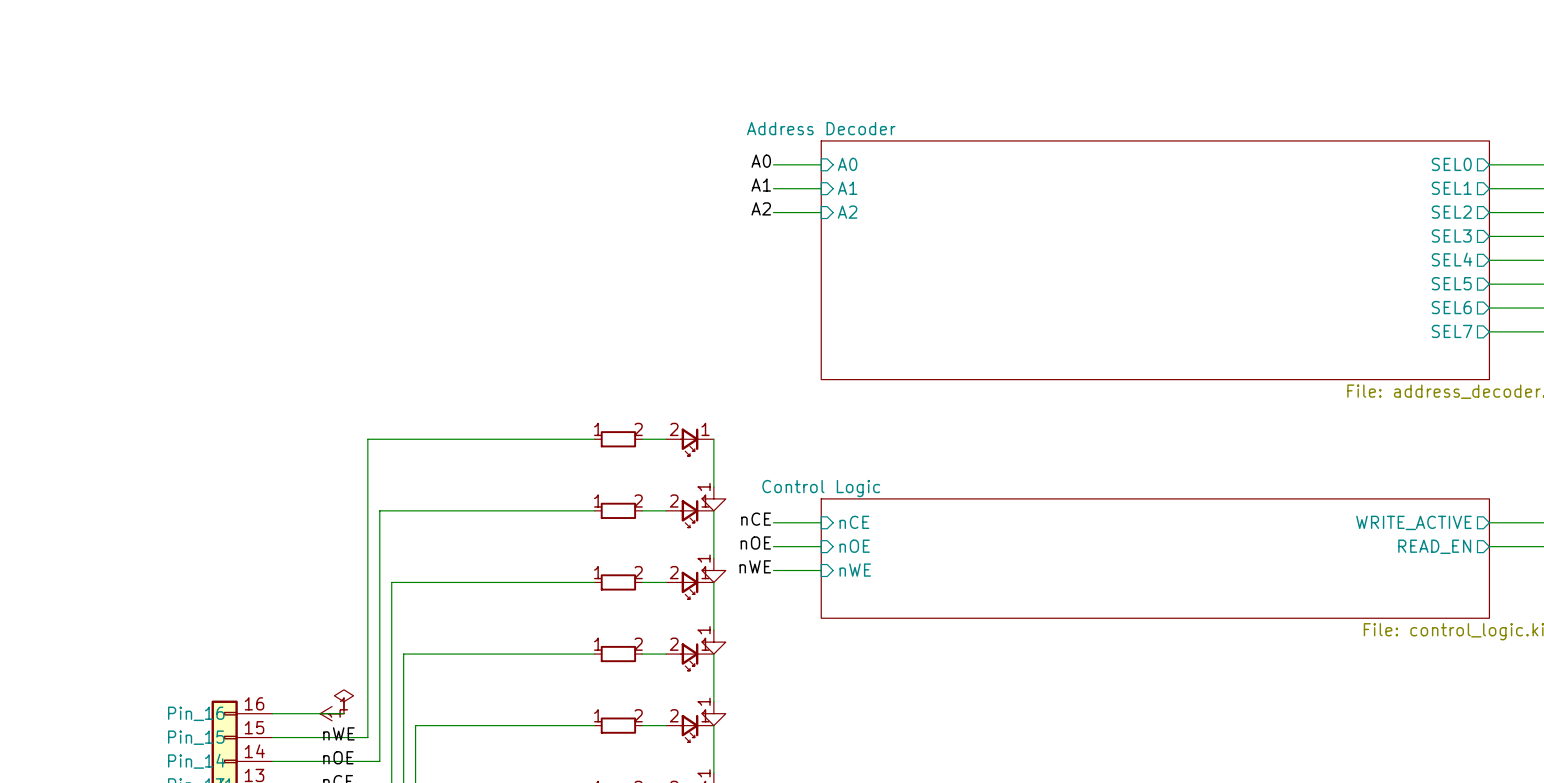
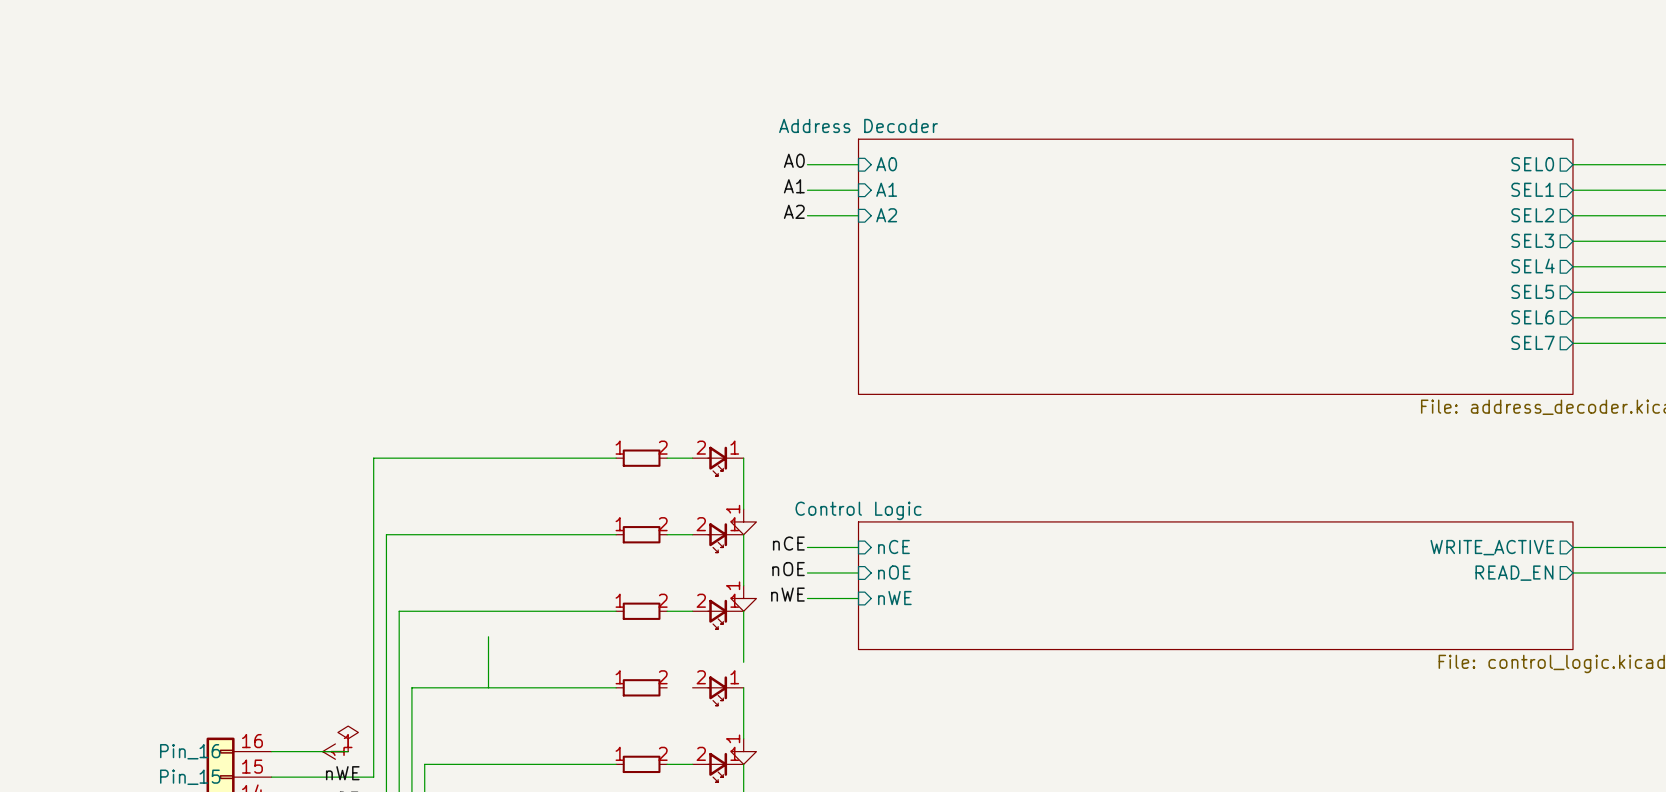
wire: none -> (488, 636) (488, 687)
power symbol: (713, 642) -> none
wire: (642, 654) (666, 654) -> none

